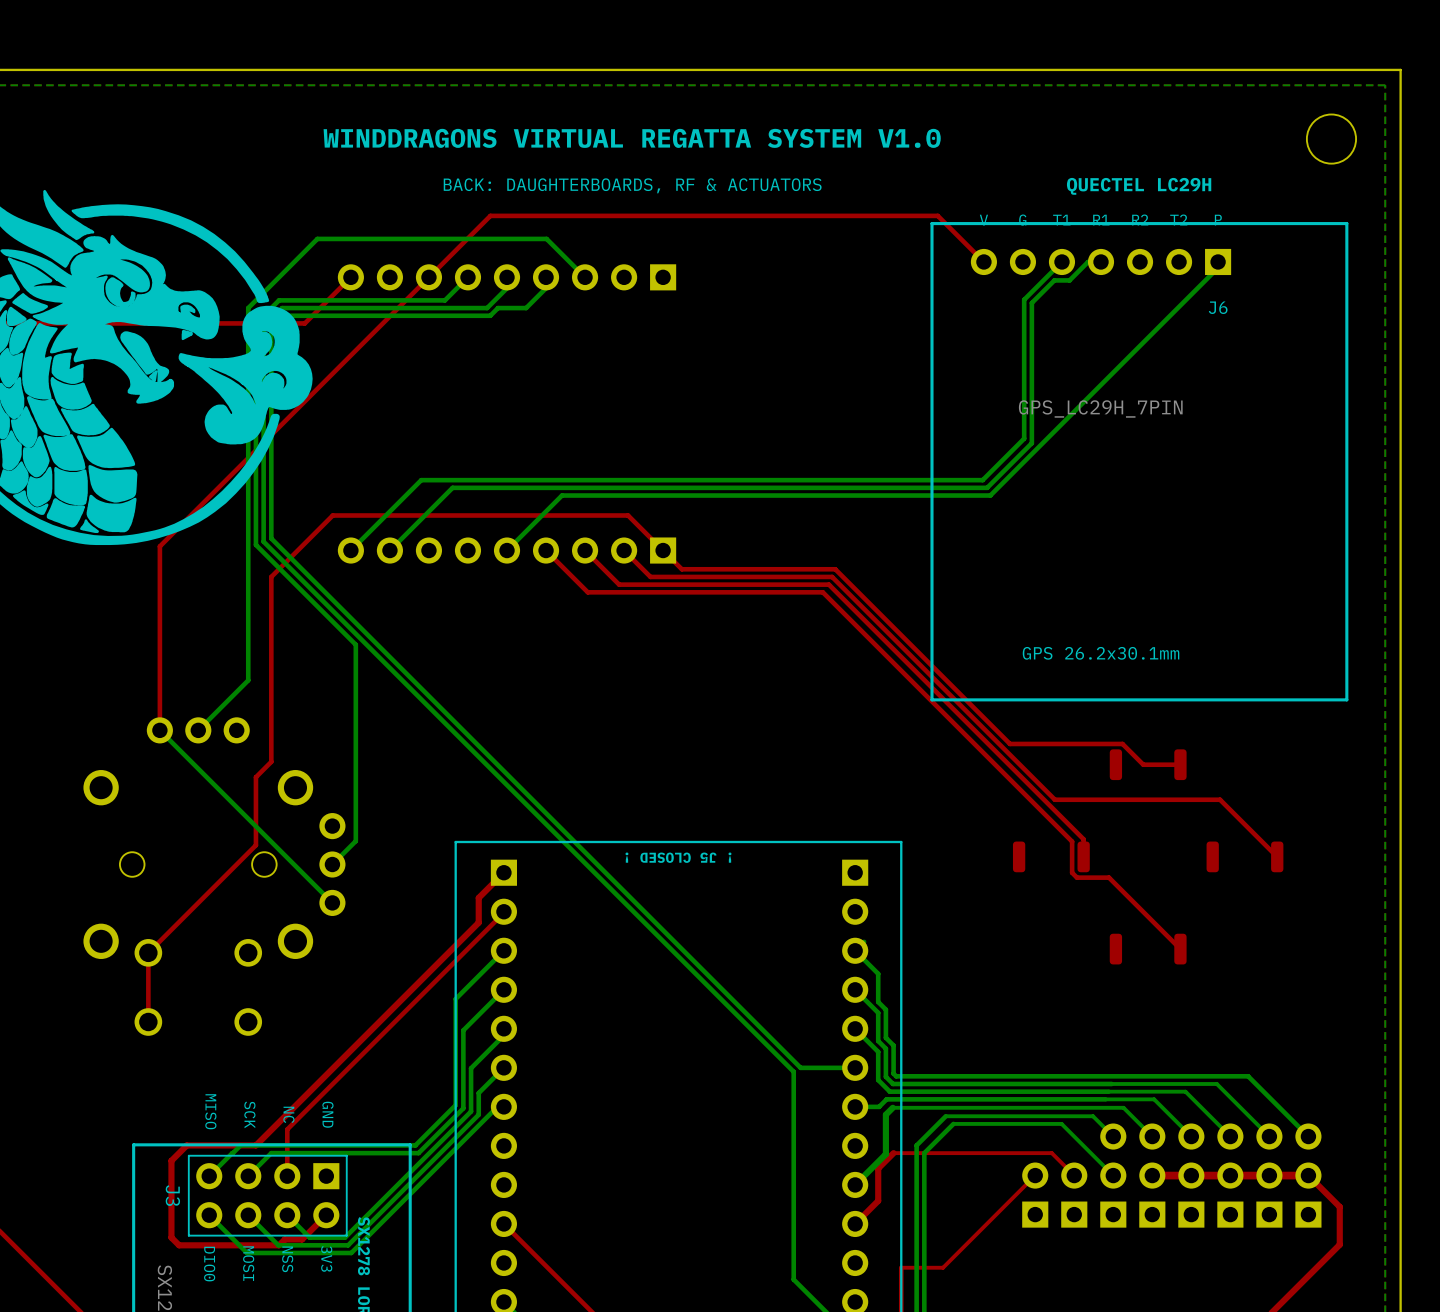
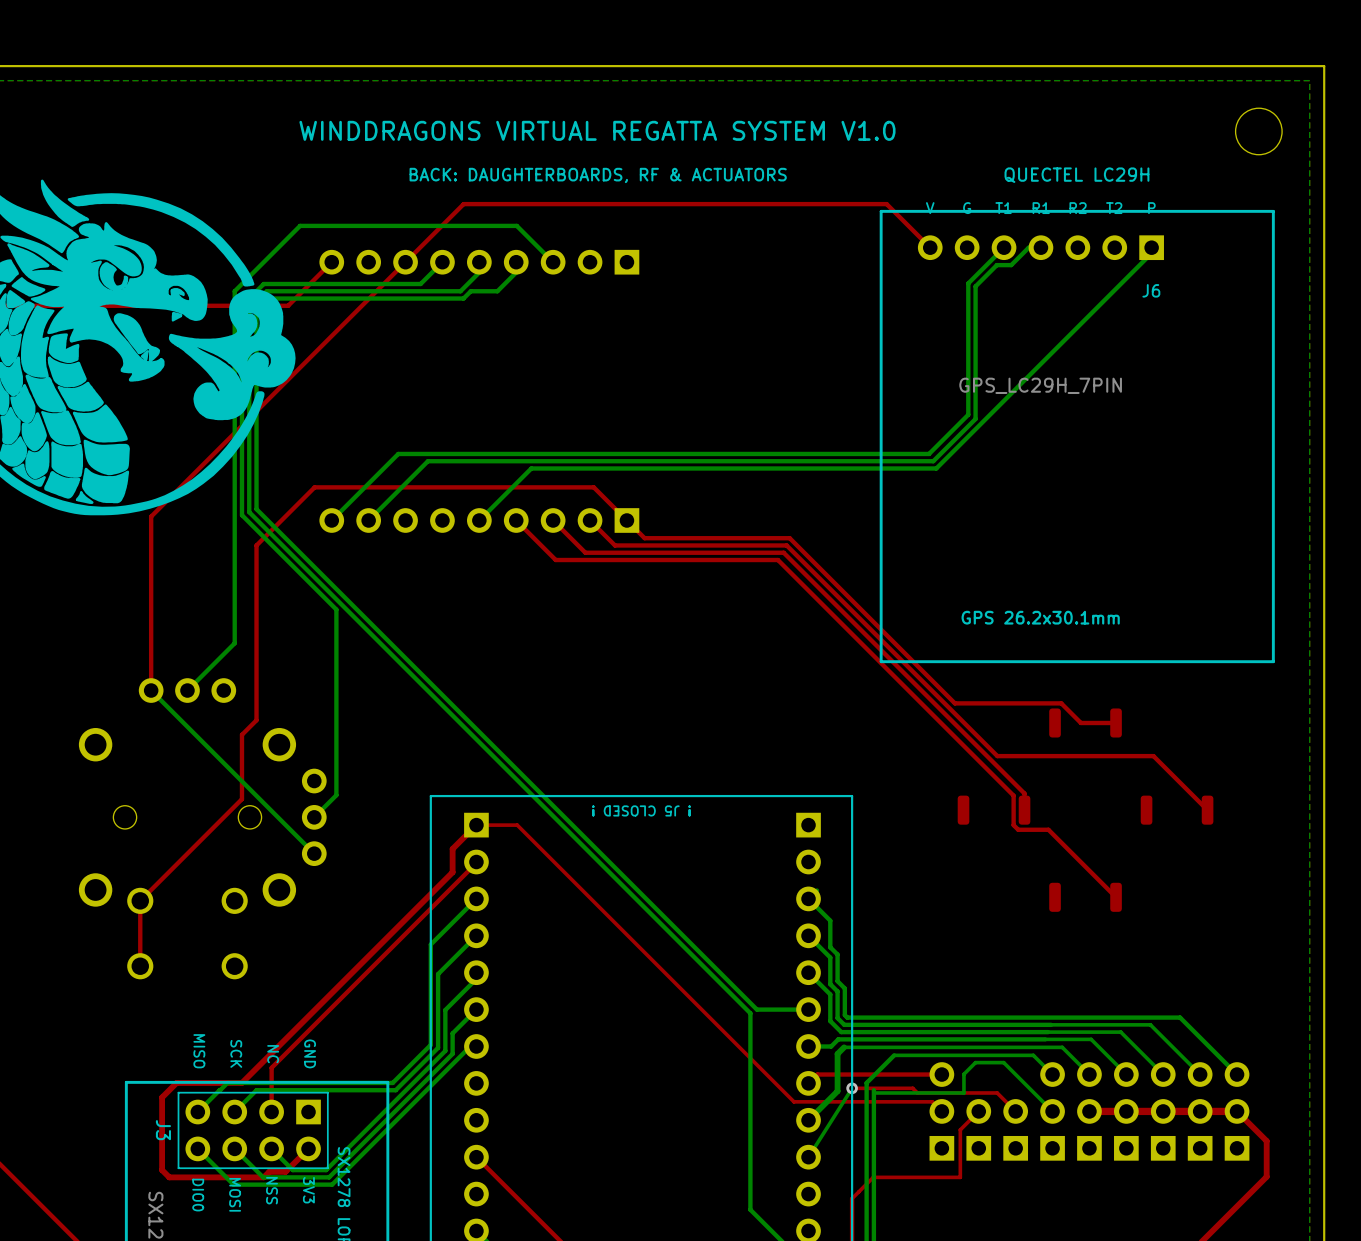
top track: none -> (476, 825) (517, 825) (793, 1101) (932, 1101) (941, 1111)
bottom track: (1031, 1123) (953, 1123) (924, 1153) -> (975, 1062) (963, 1074) (963, 1092) (873, 1092) (873, 1090)
top track: none -> (941, 1074) (817, 1074) (808, 1083)
bottom track: none -> (852, 1088) (808, 1157)
via: none -> (852, 1088)
top track: (1054, 1156) (1051, 1153) (893, 1153) (878, 1168) (878, 1200) (855, 1223) -> (997, 1092) (917, 1092) (912, 1088) (852, 1088)
part: none -> (941, 1111)
top track: (1015, 1195) (943, 1267) (901, 1267) -> (960, 1129) (960, 1177) (873, 1177) (852, 1198)

